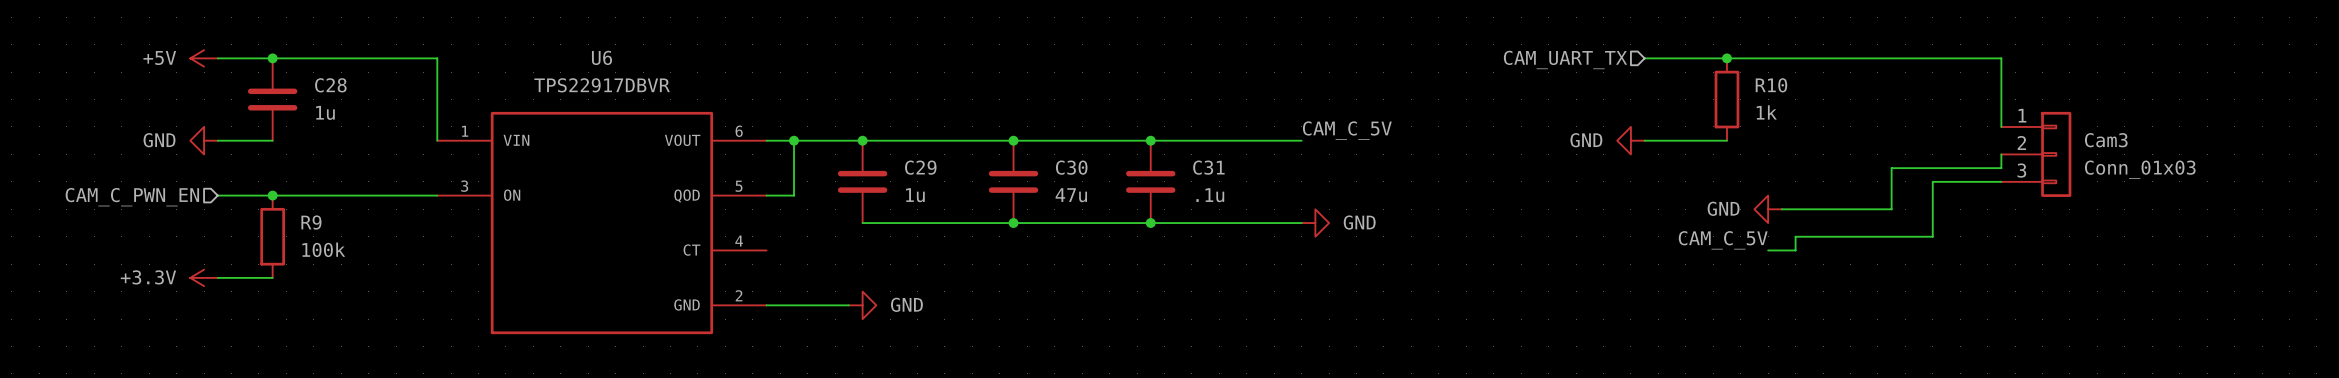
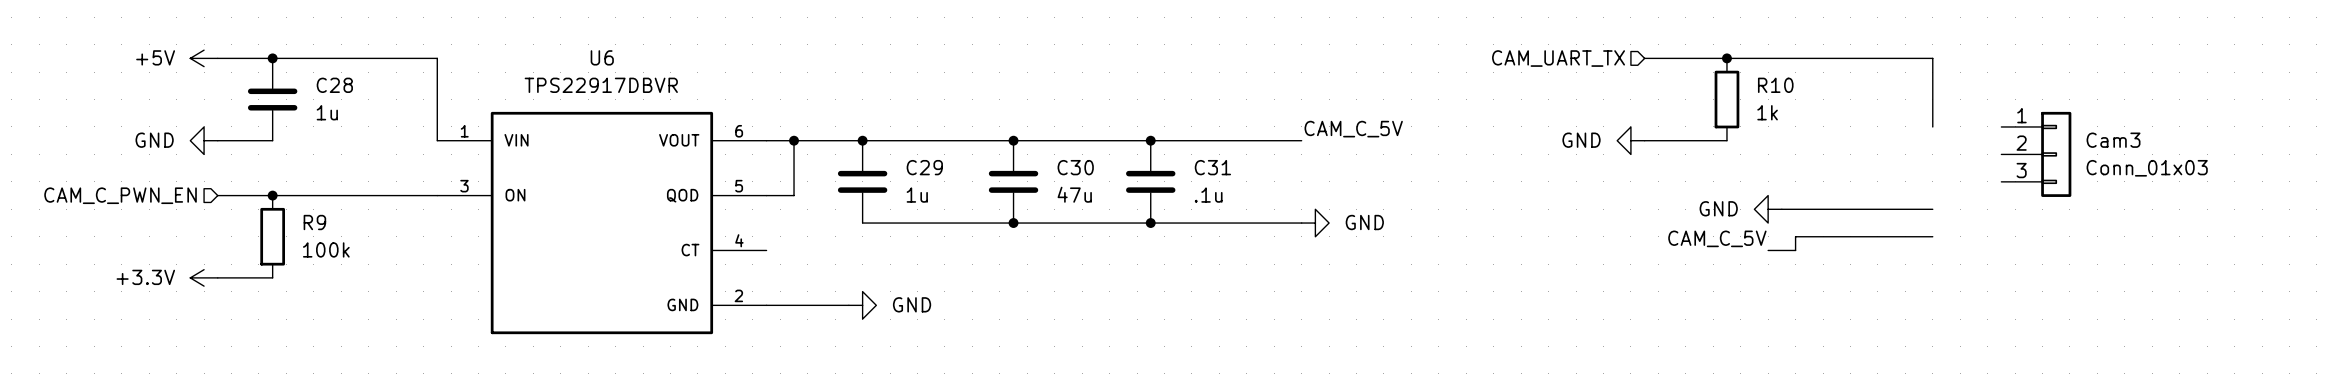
wire: (1932, 58) (2001, 58) (2001, 126) -> (1932, 58) (1932, 126)
wire: (2001, 154) (2001, 168) (1891, 168) (1891, 209) -> (1932, 209) (1891, 209)
wire: (2001, 181) (1932, 181) (1932, 236) -> none

